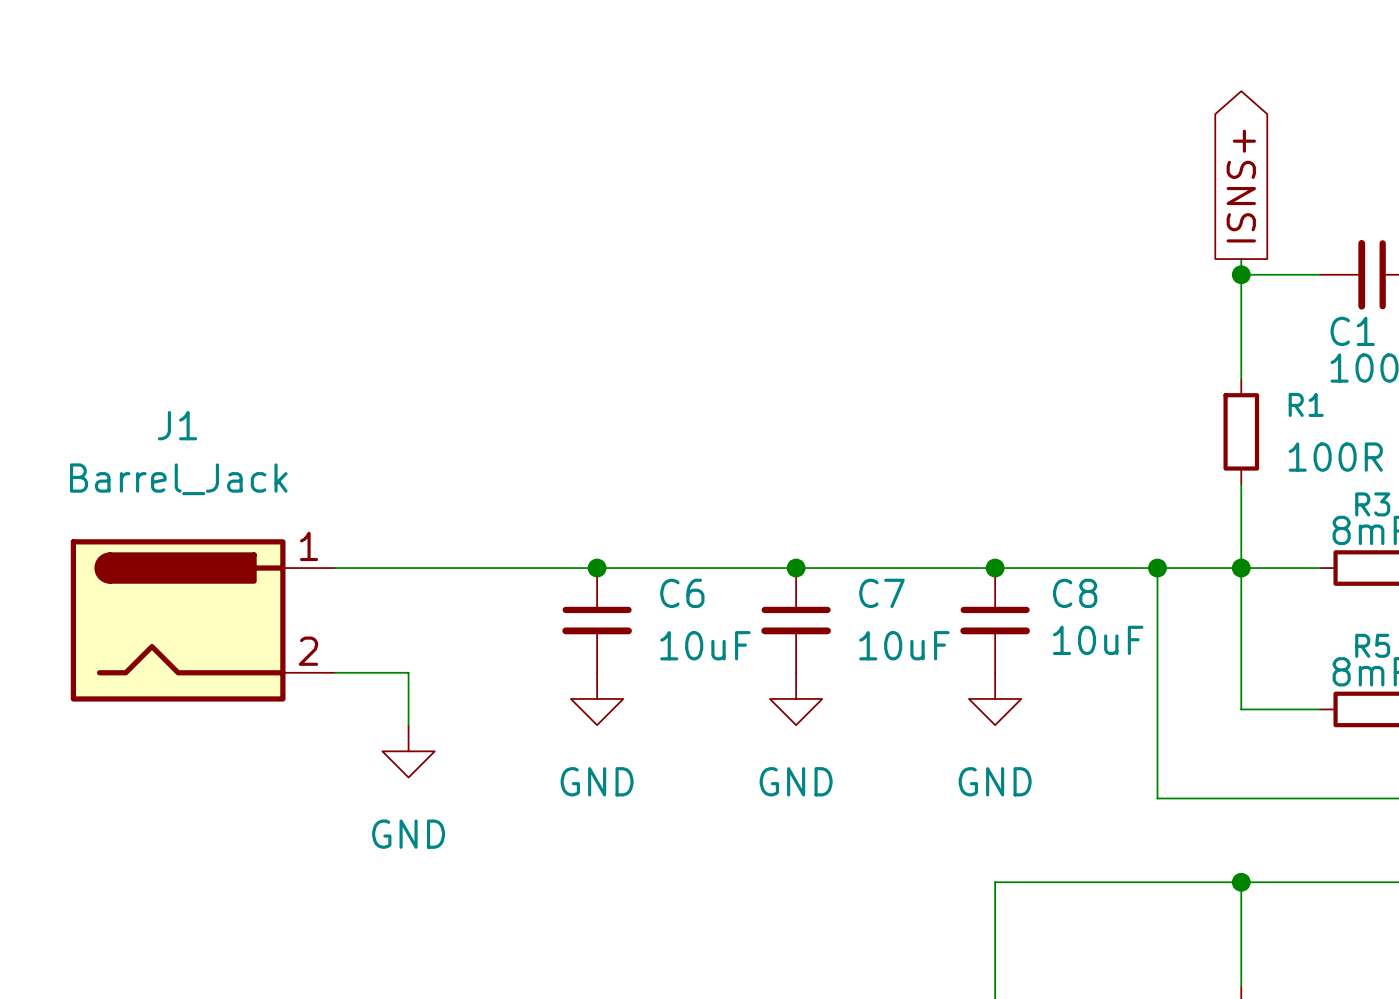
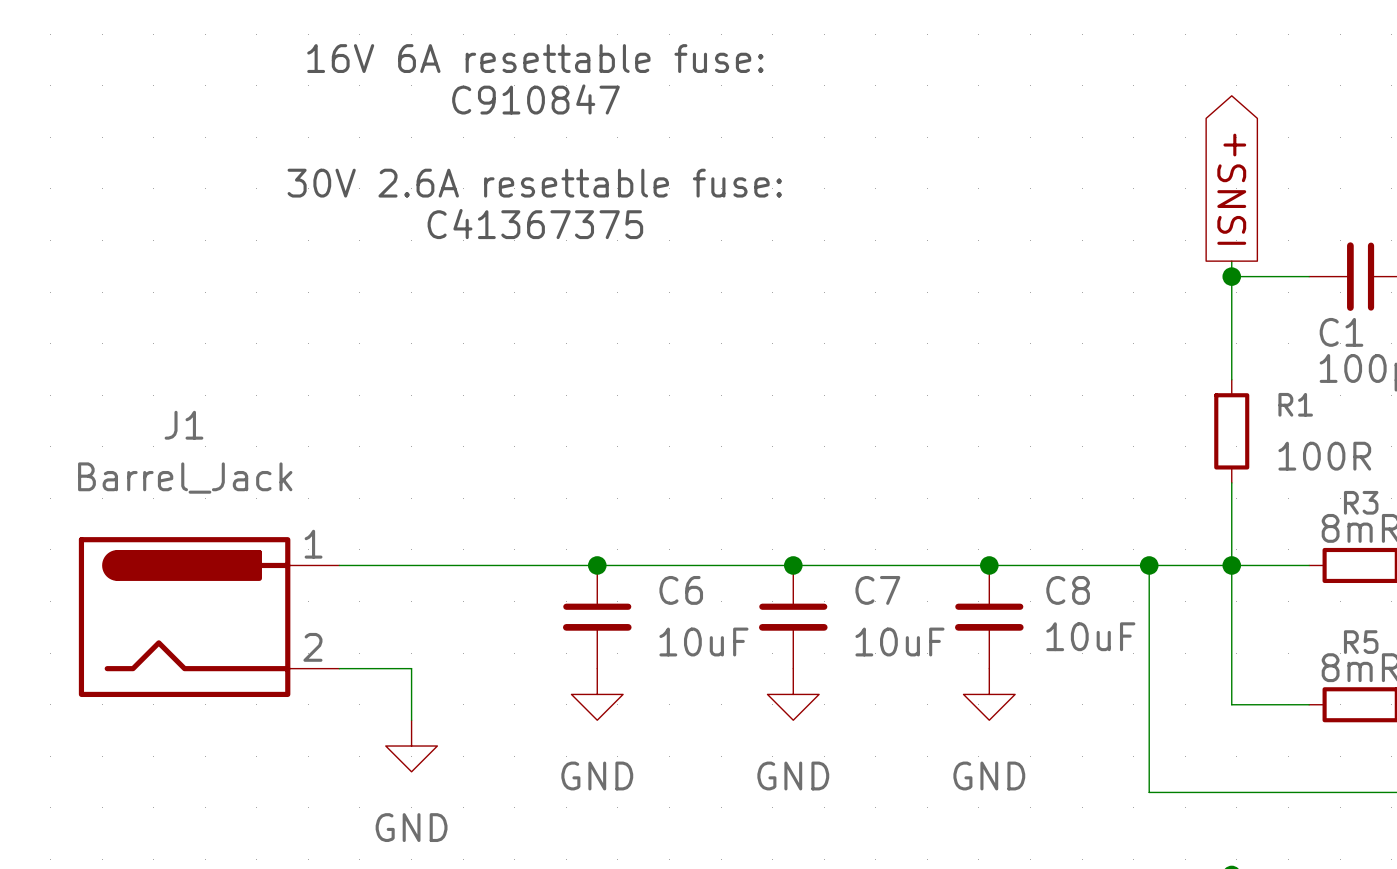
text: none -> 16V 6A resettable fuse: (535, 58)
text: none -> C910847 (535, 99)
text: none -> 30V 2.6A resettable fuse: (534, 183)
text: none -> C41367375 (535, 224)

